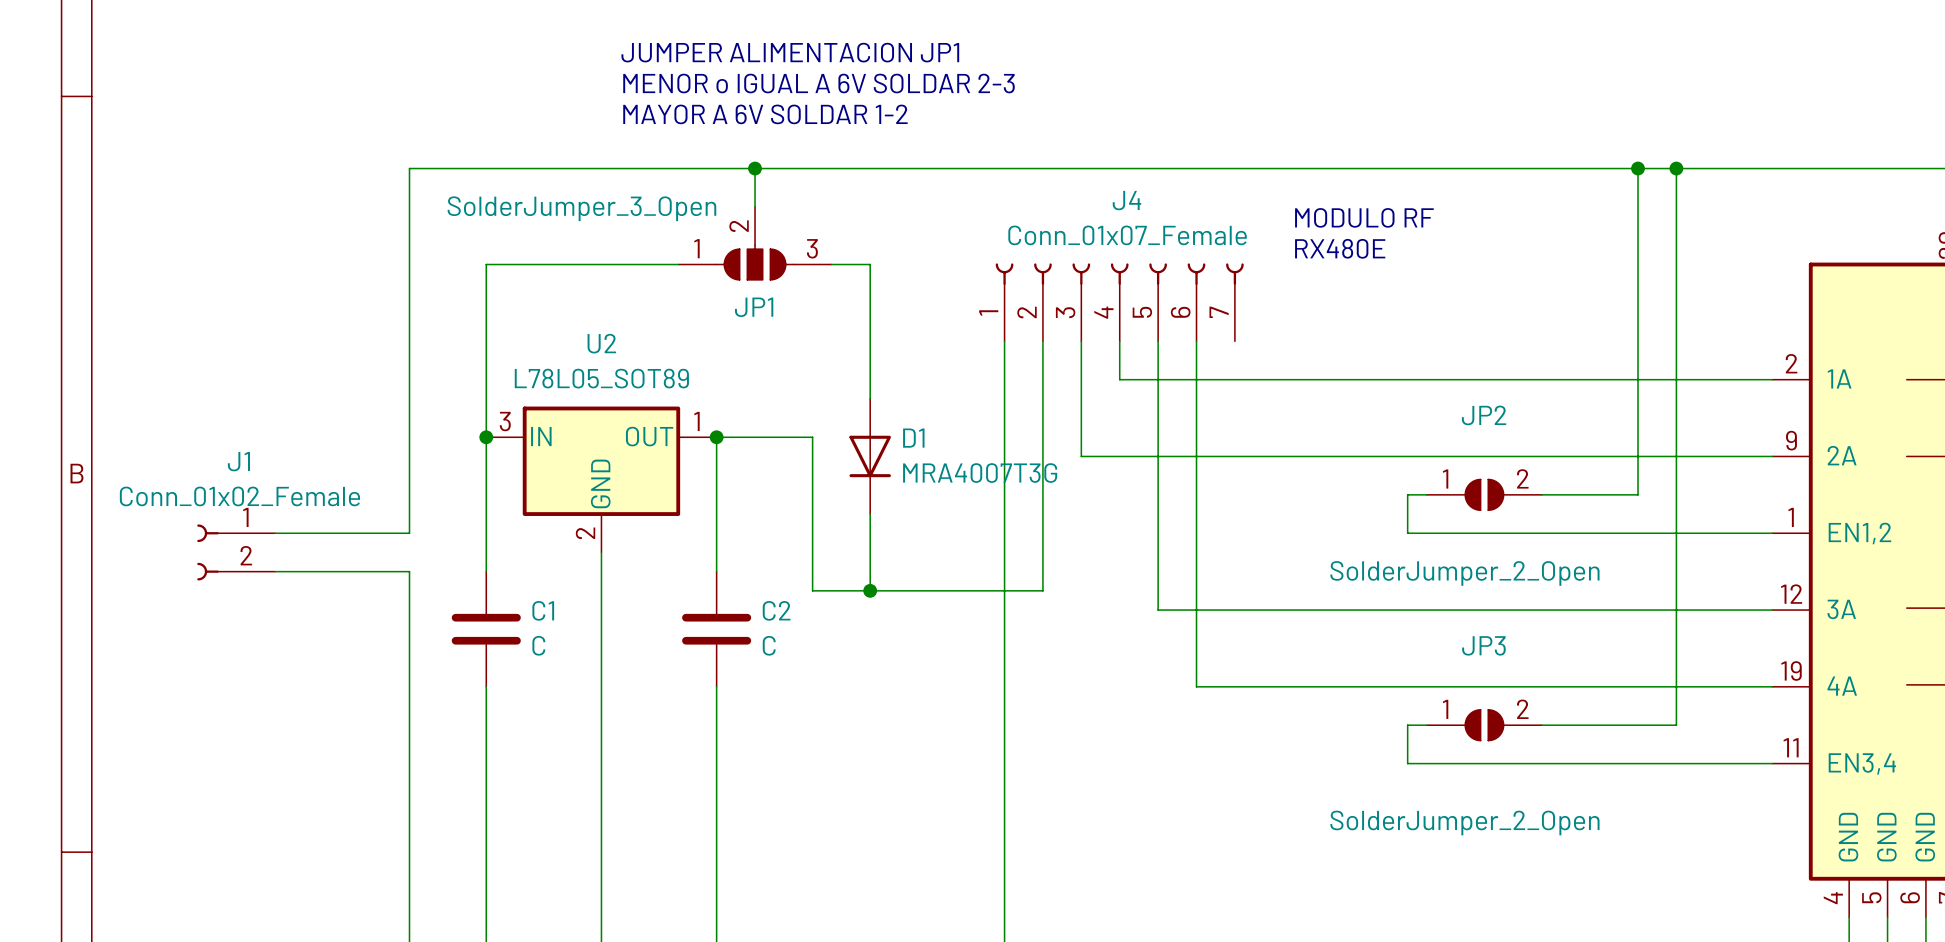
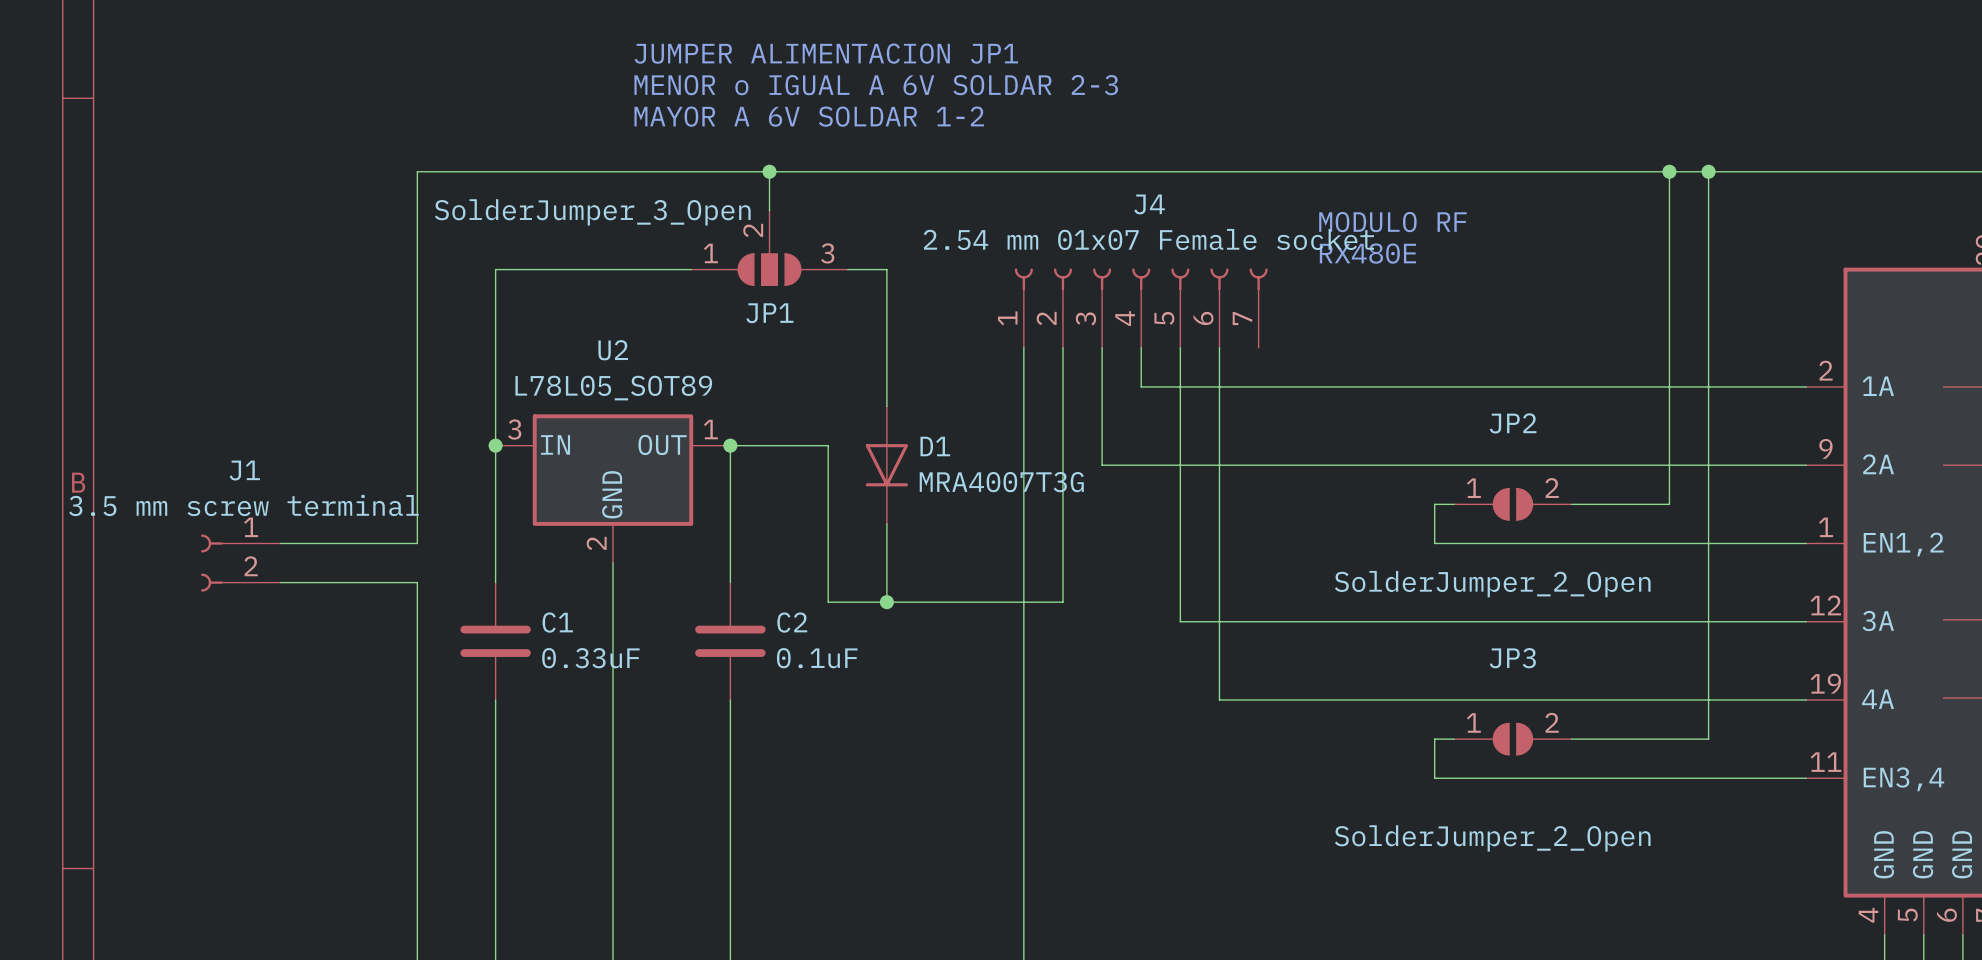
J4 value: Conn_01x07_Female (1127, 235) -> 2.54 mm 01x07 Female socket (1148, 239)
J1 value: Conn_01x02_Female (239, 496) -> 3.5 mm screw terminal (243, 505)
C1 value: C (538, 645) -> 0.33uF (590, 658)
C2 value: C (769, 645) -> 0.1uF (817, 658)

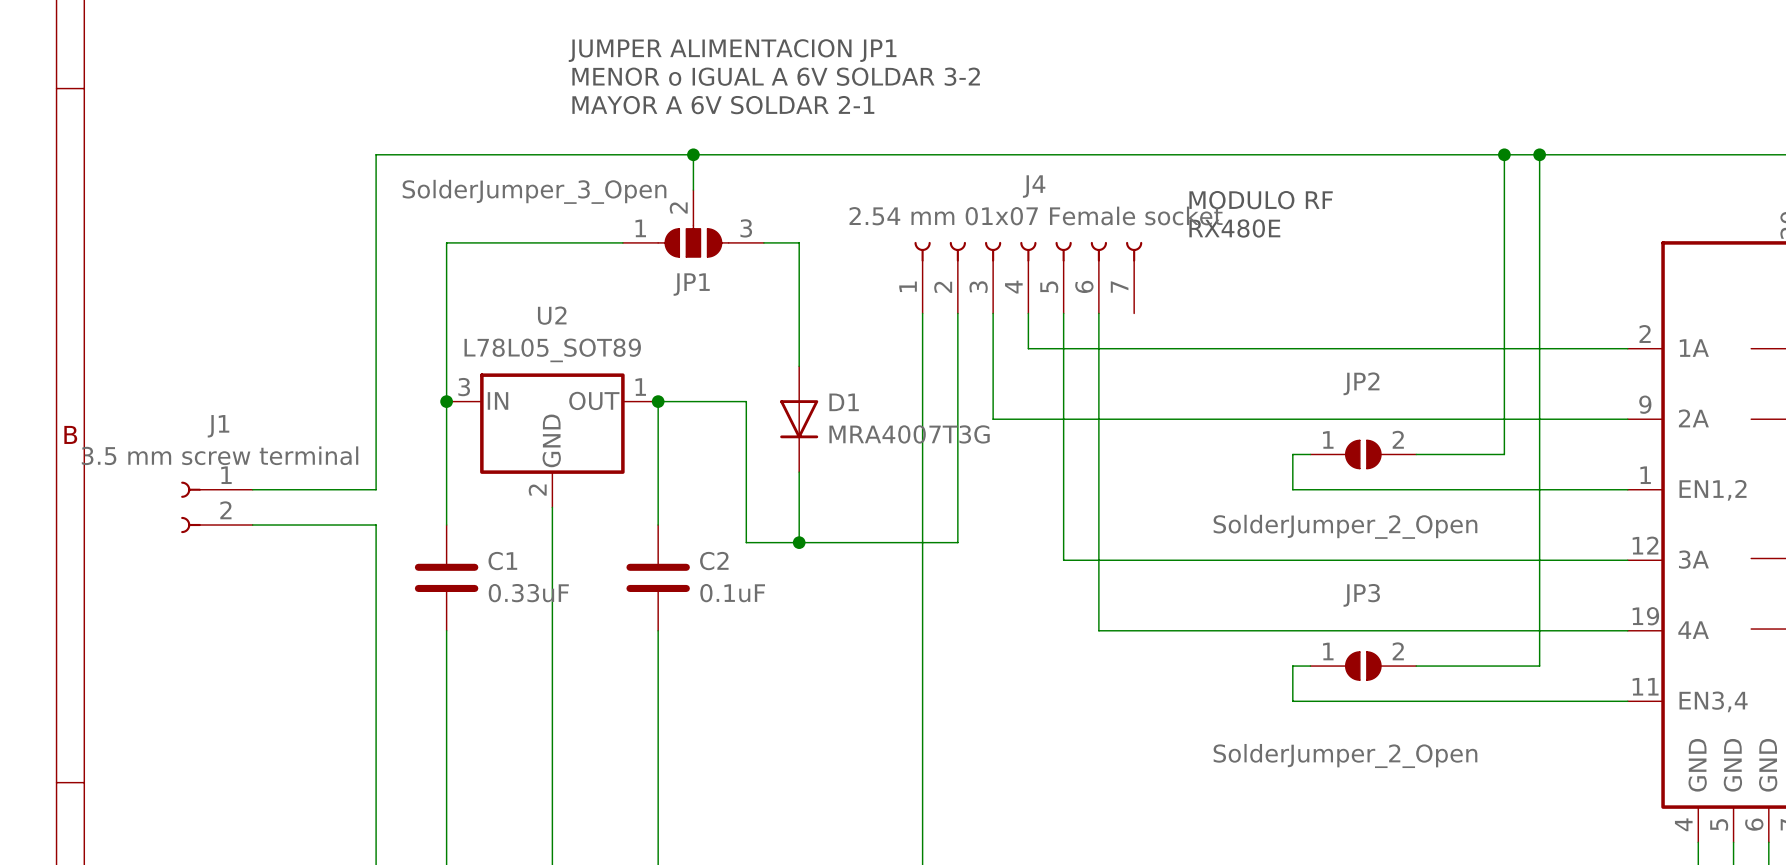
text: MENOR o IGUAL A 6V SOLDAR 2-3 (876, 85) -> MENOR o IGUAL A 6V SOLDAR 3-2 (776, 76)
text: MAYOR A 6V SOLDAR 1-2 (809, 116) -> MAYOR A 6V SOLDAR 2-1 (723, 105)

